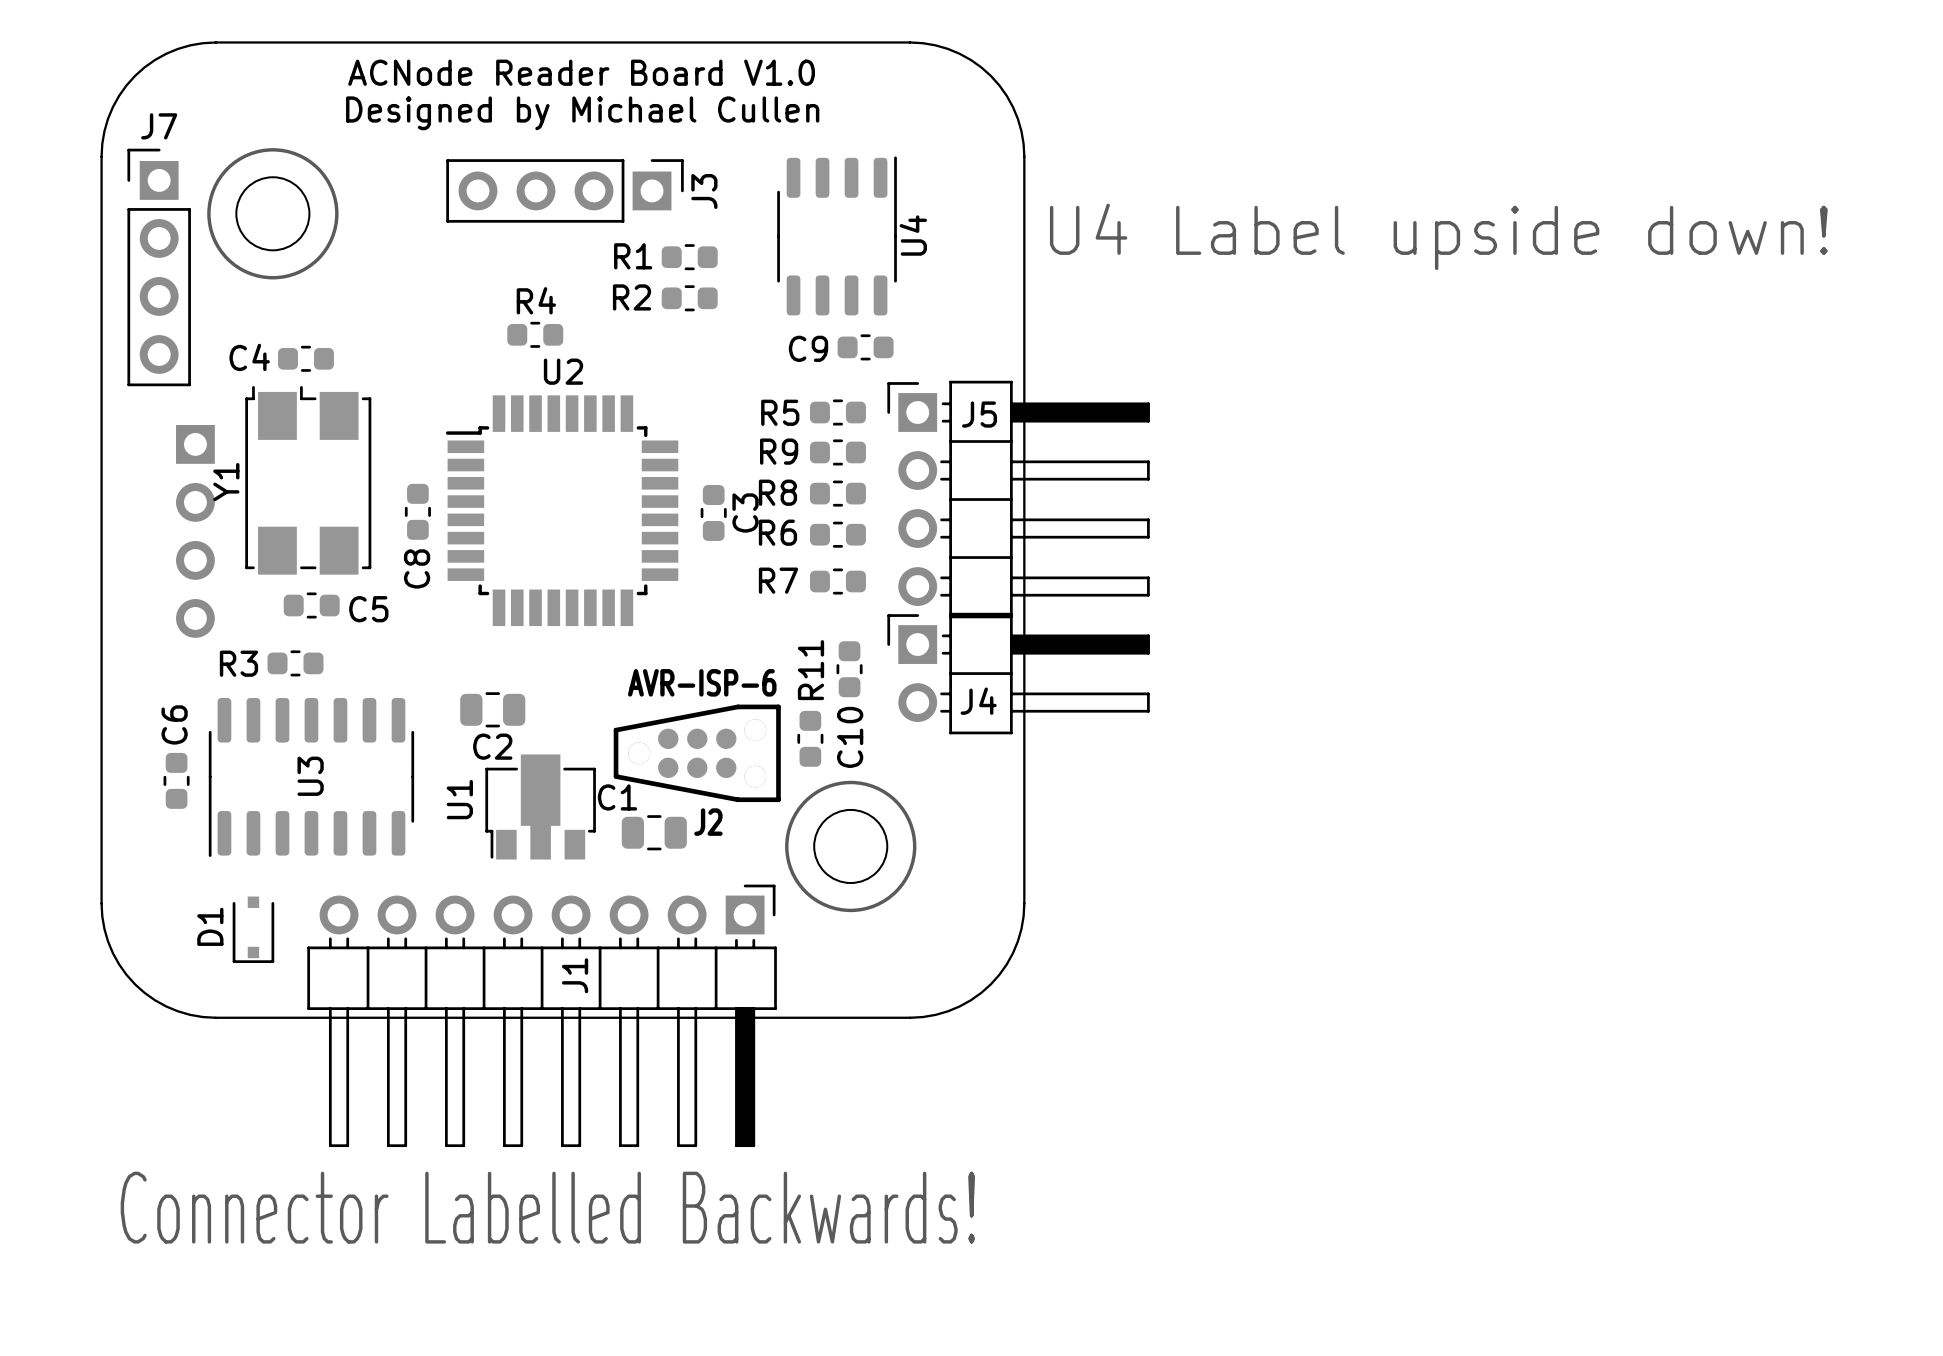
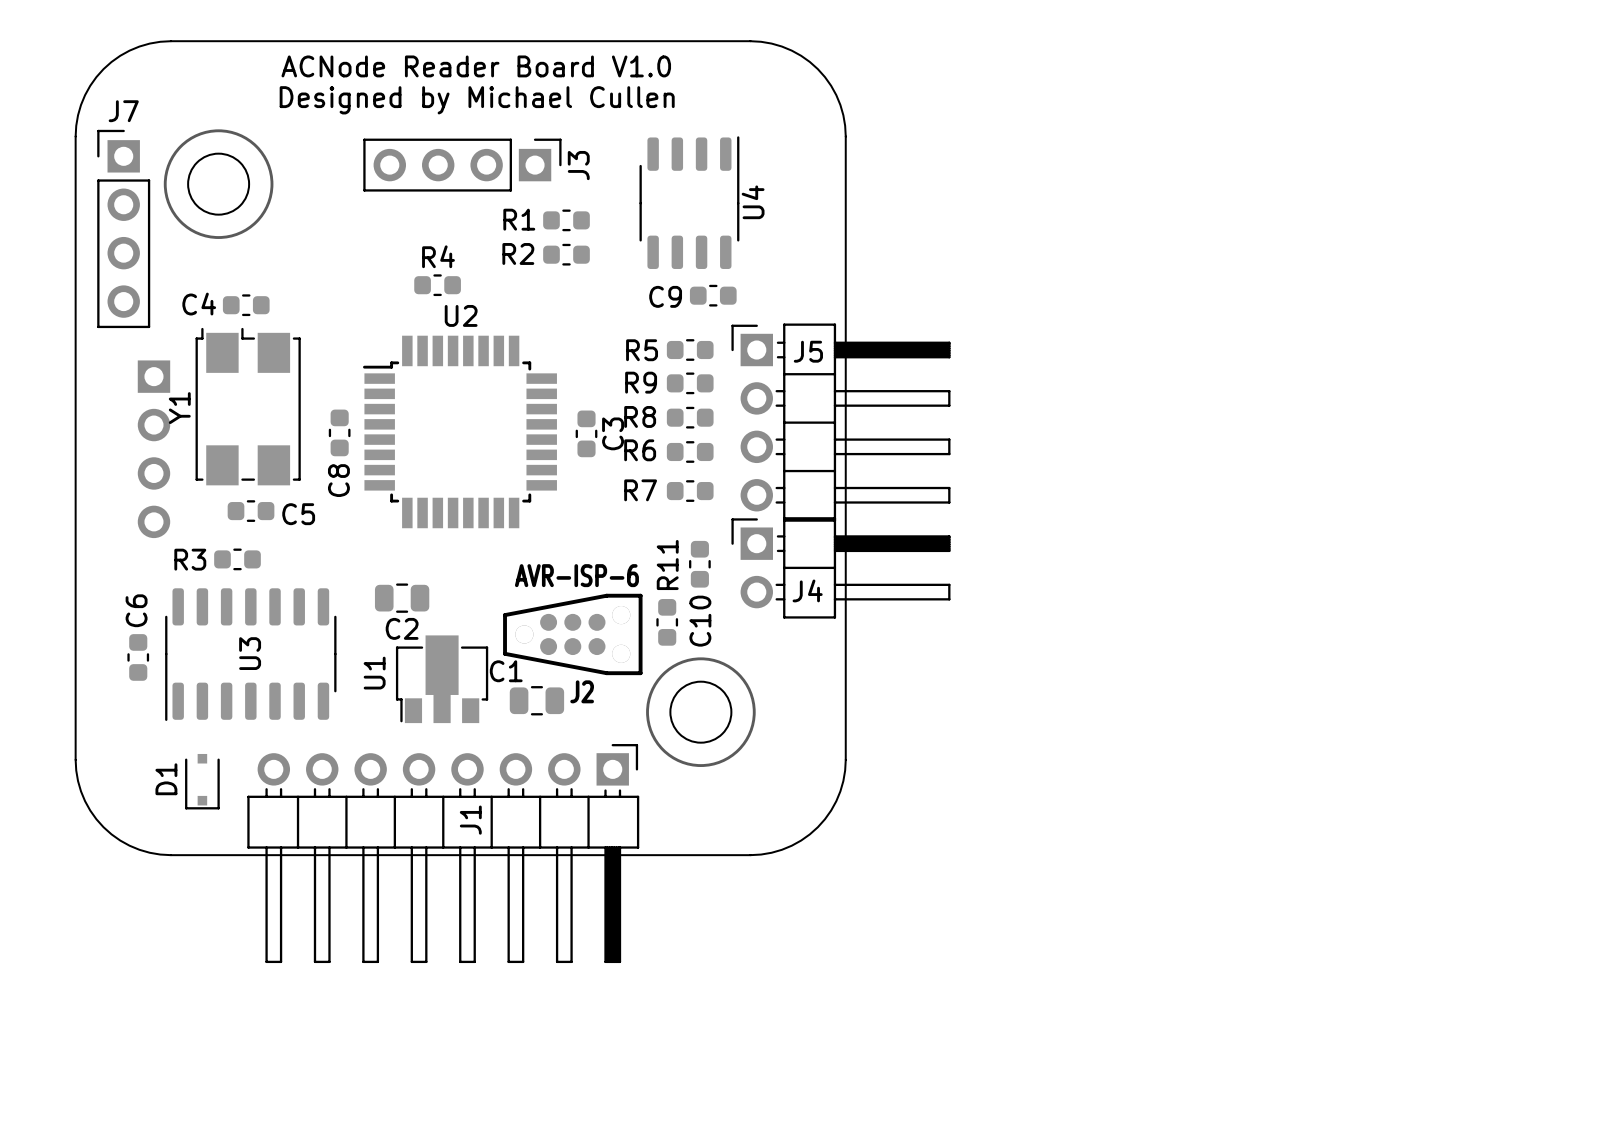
text: U4 Label upside down! (1438, 236) -> none
text: Connector Labelled Backwards! (547, 1207) -> none

